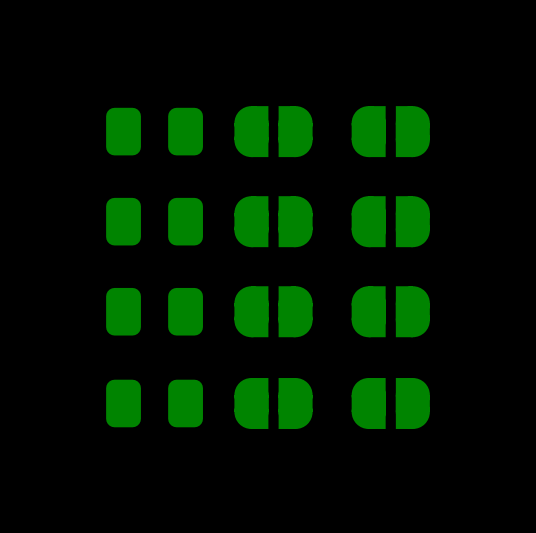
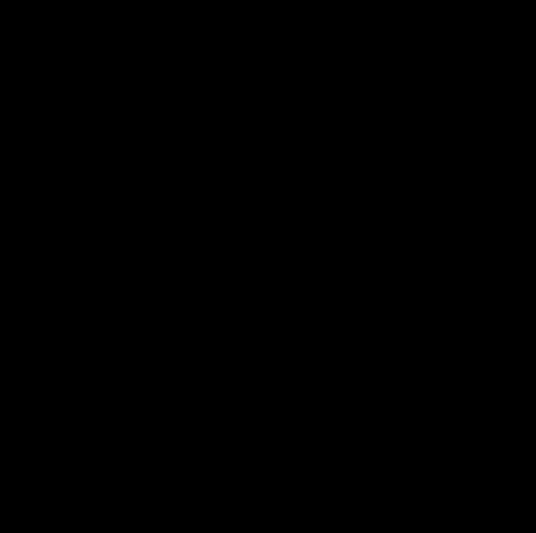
part: (154, 131) -> none
part: (273, 131) -> none
part: (390, 131) -> none
part: (154, 221) -> none
part: (273, 221) -> none
part: (390, 221) -> none
part: (154, 311) -> none
part: (273, 311) -> none
part: (390, 311) -> none
part: (154, 403) -> none
part: (273, 403) -> none
part: (390, 403) -> none

